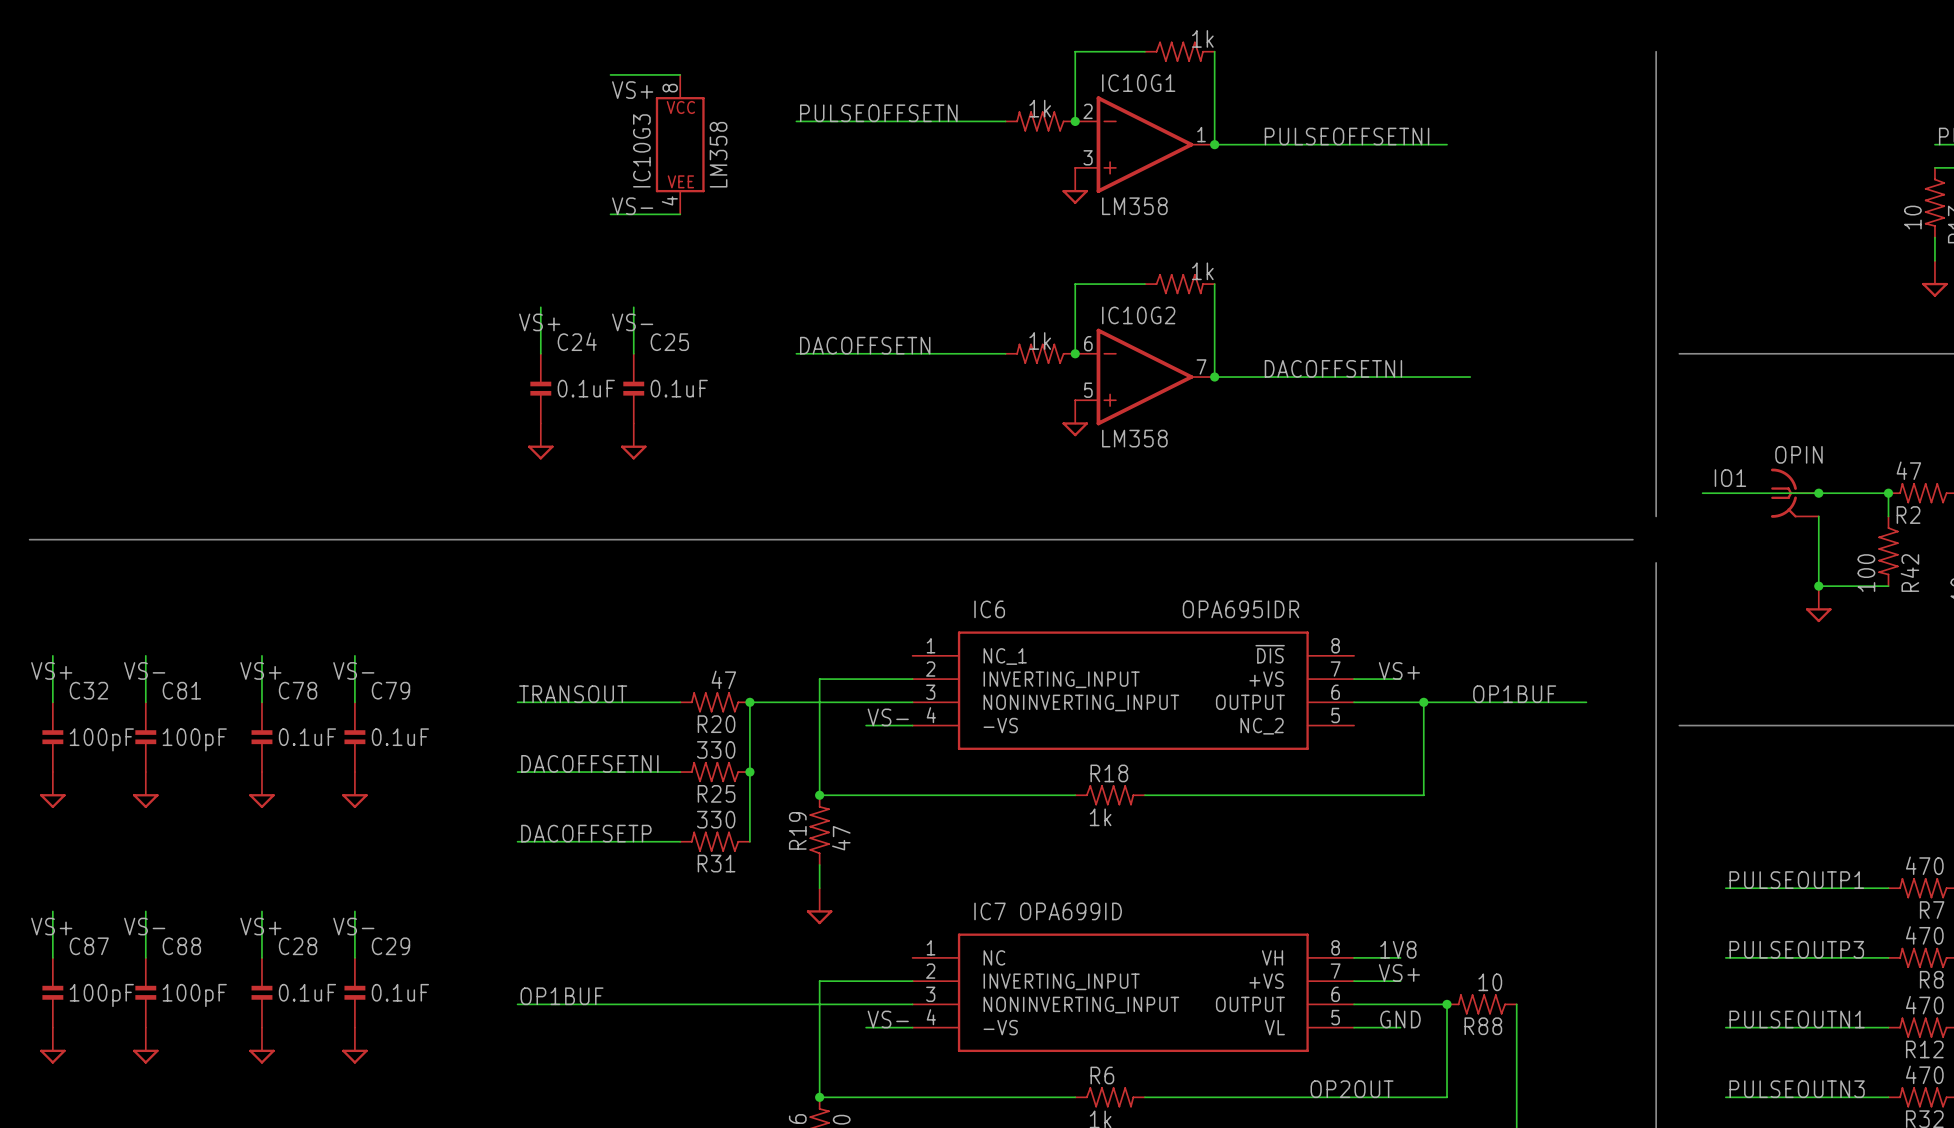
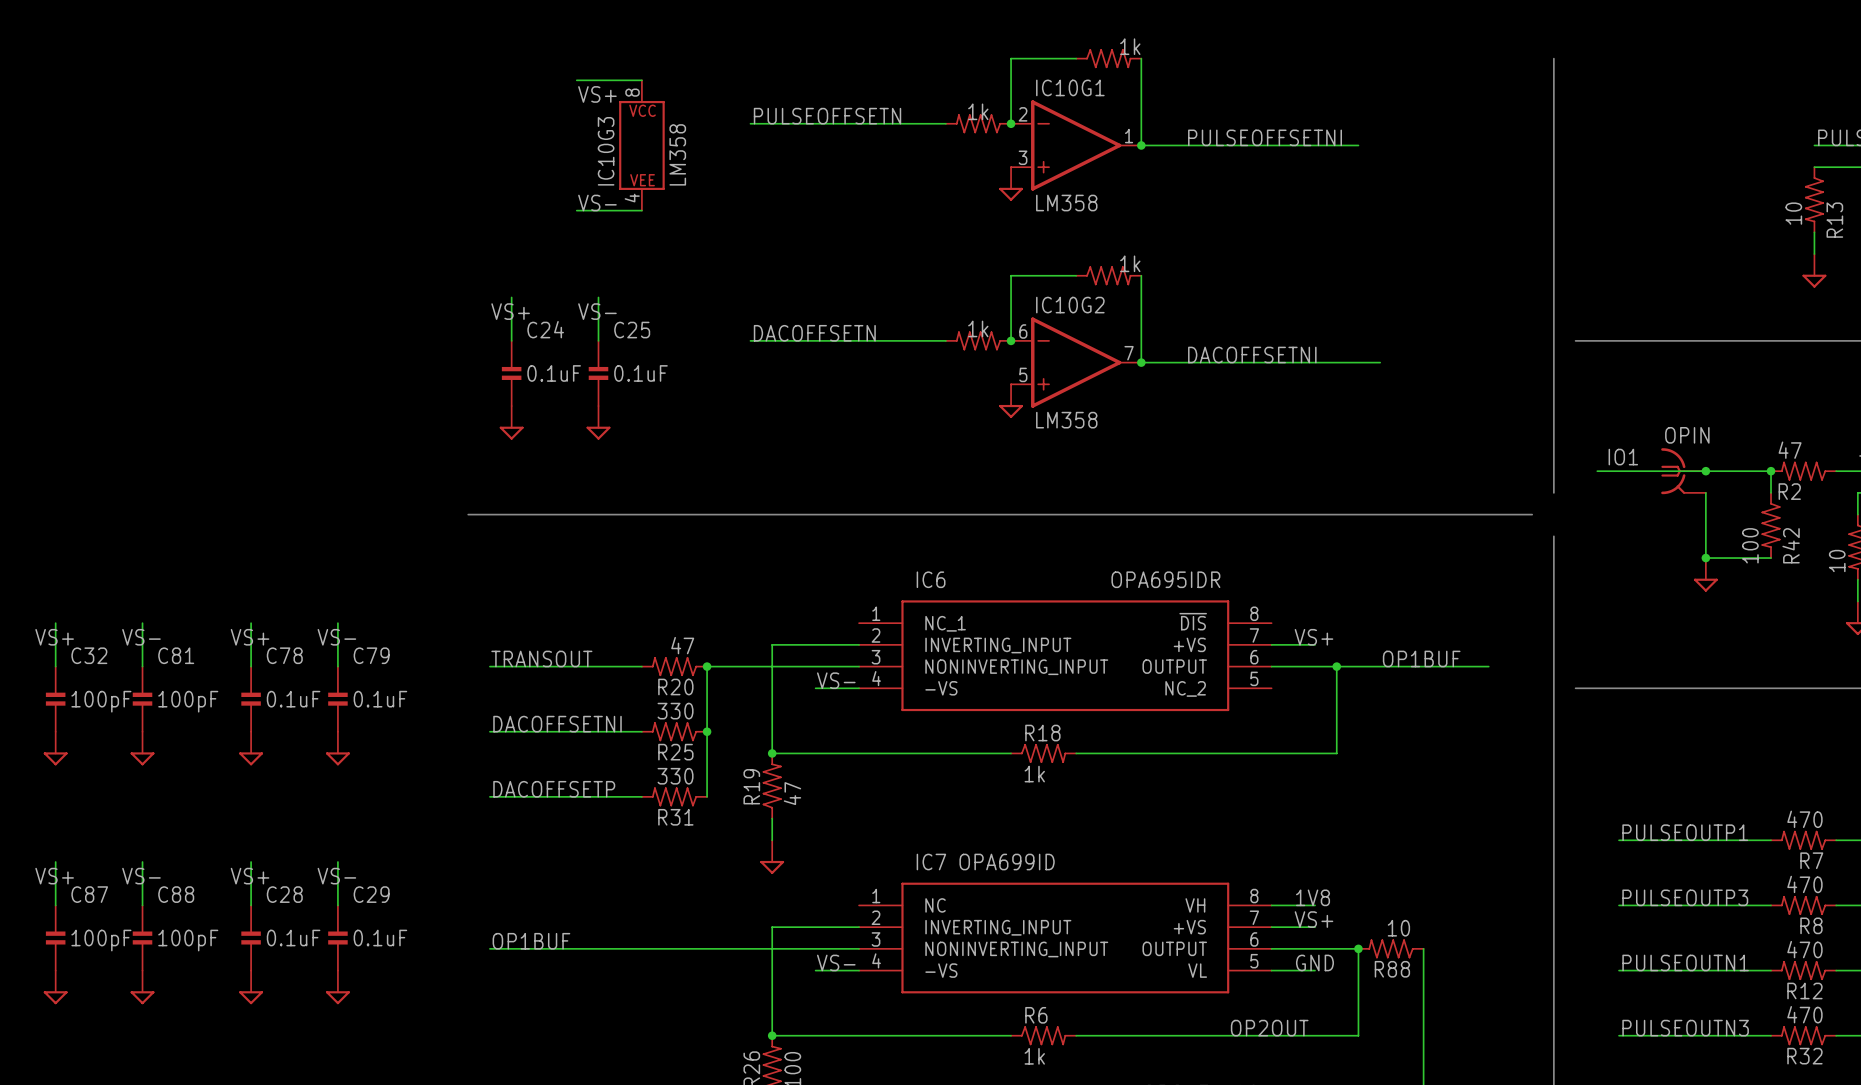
line: (29, 539) (494, 539) -> none

